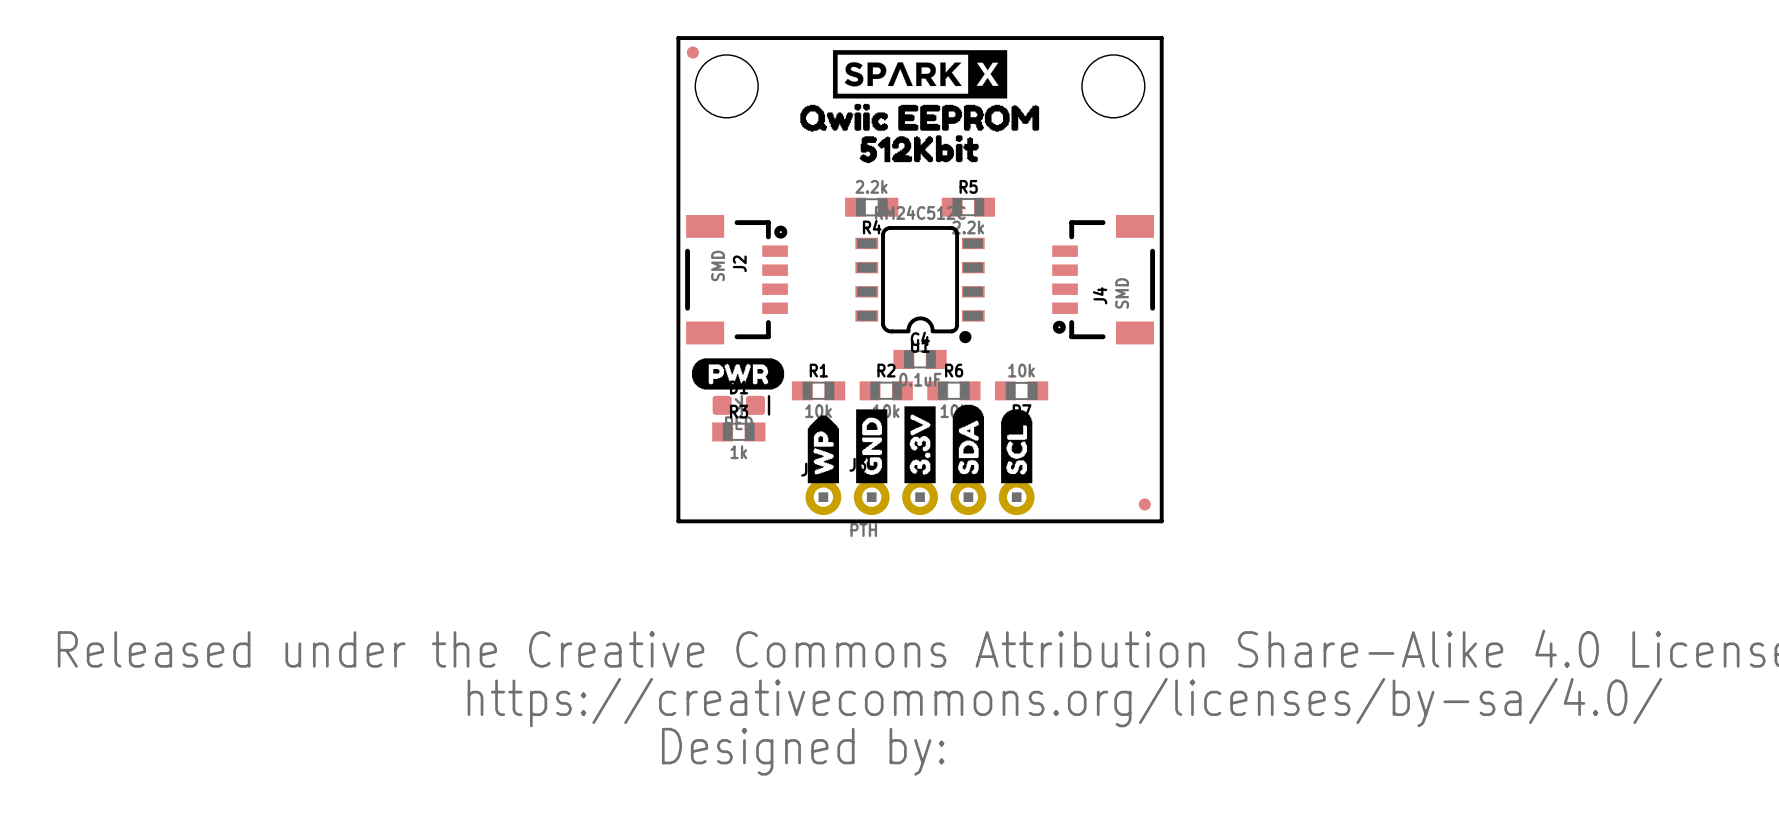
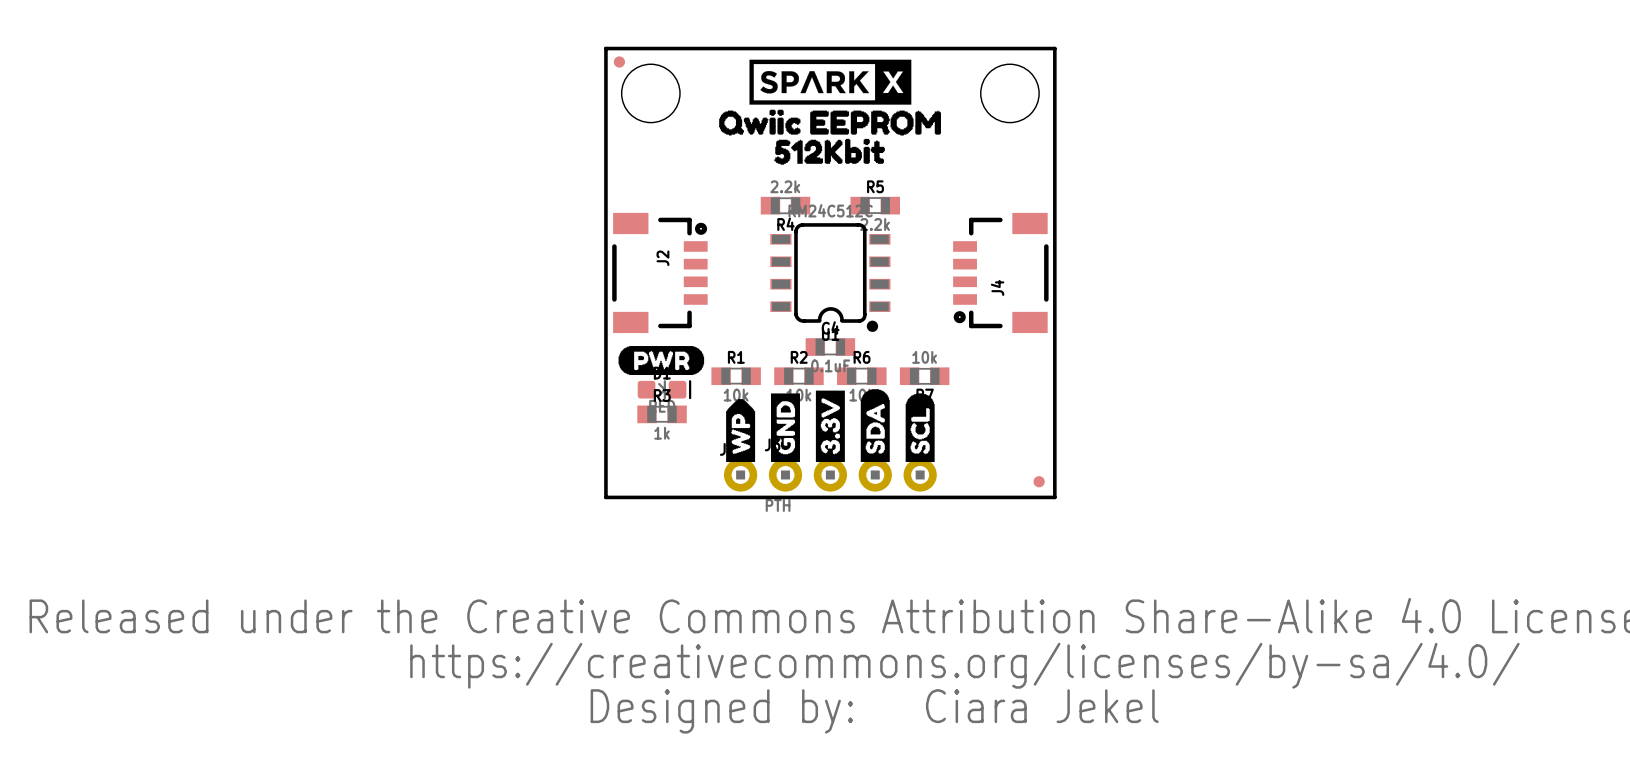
J2 value: SMD (718, 265) -> none
J4 value: SMD (1122, 293) -> none
text: none -> Ciara Jekel (1042, 706)

